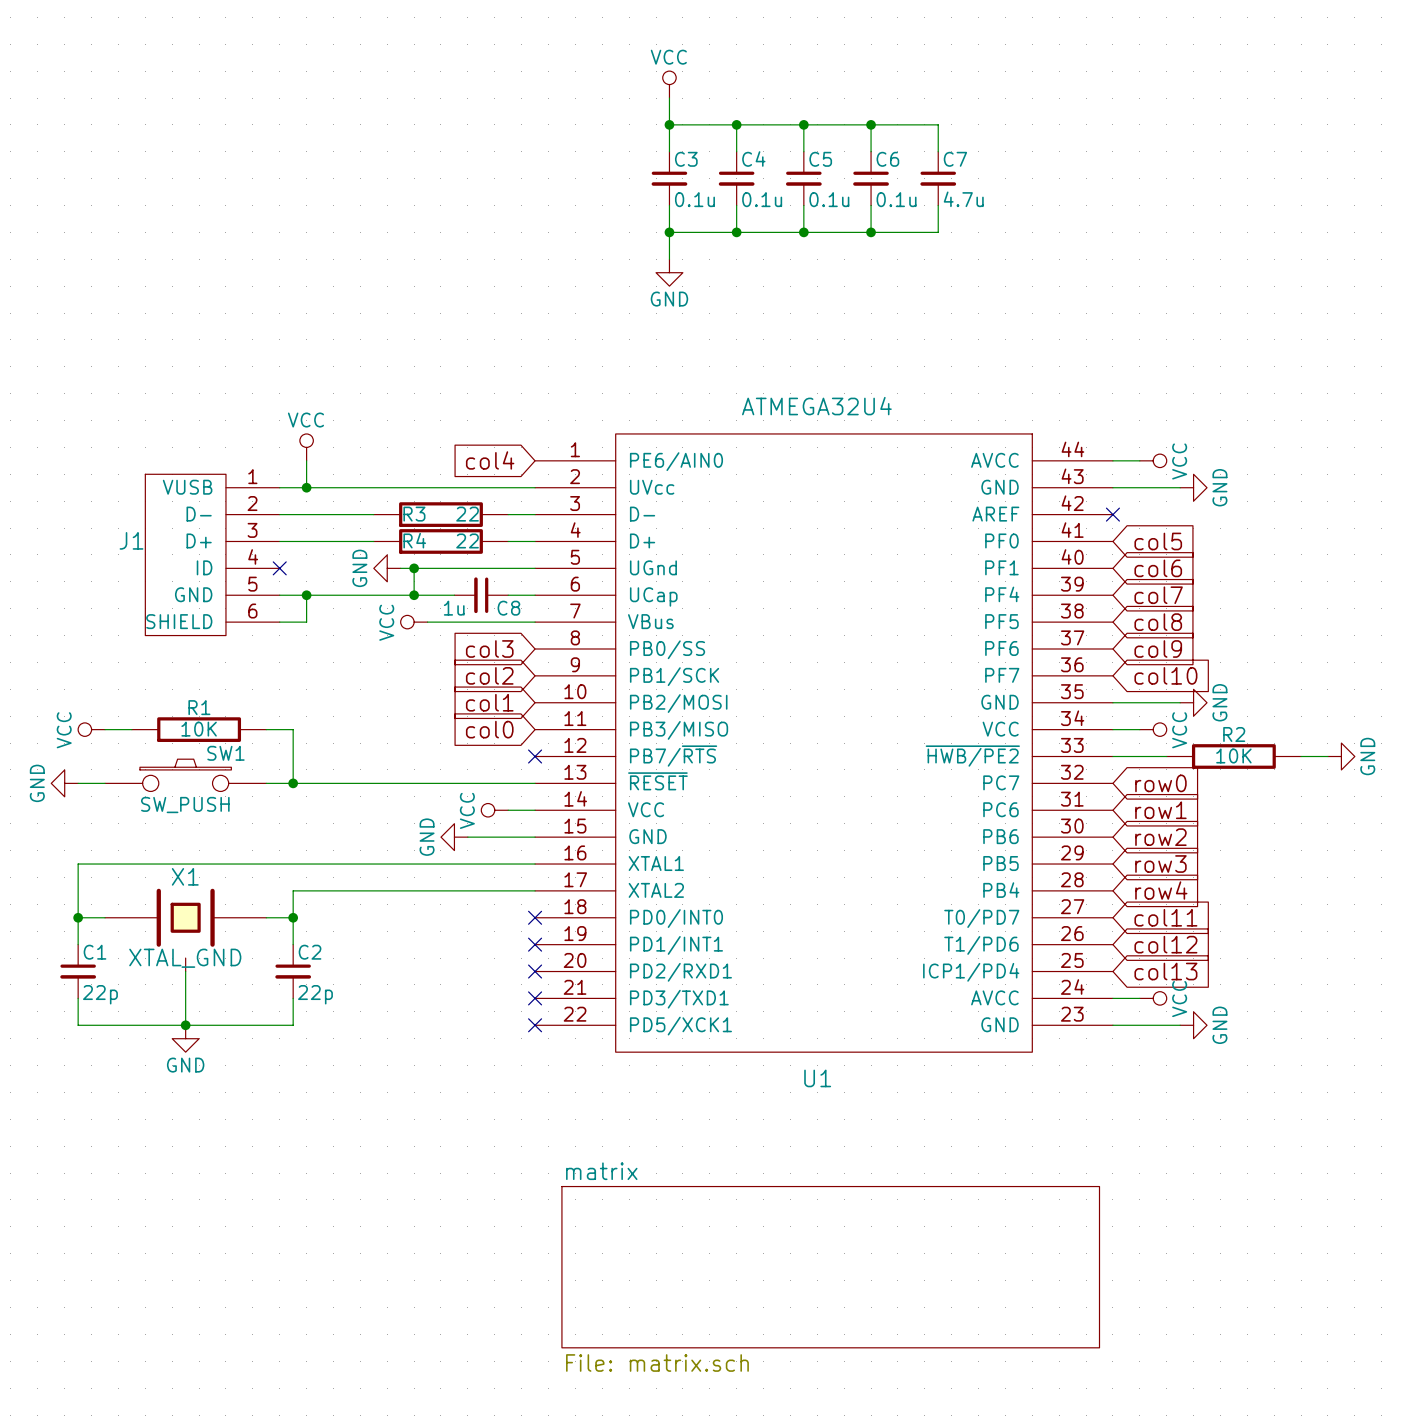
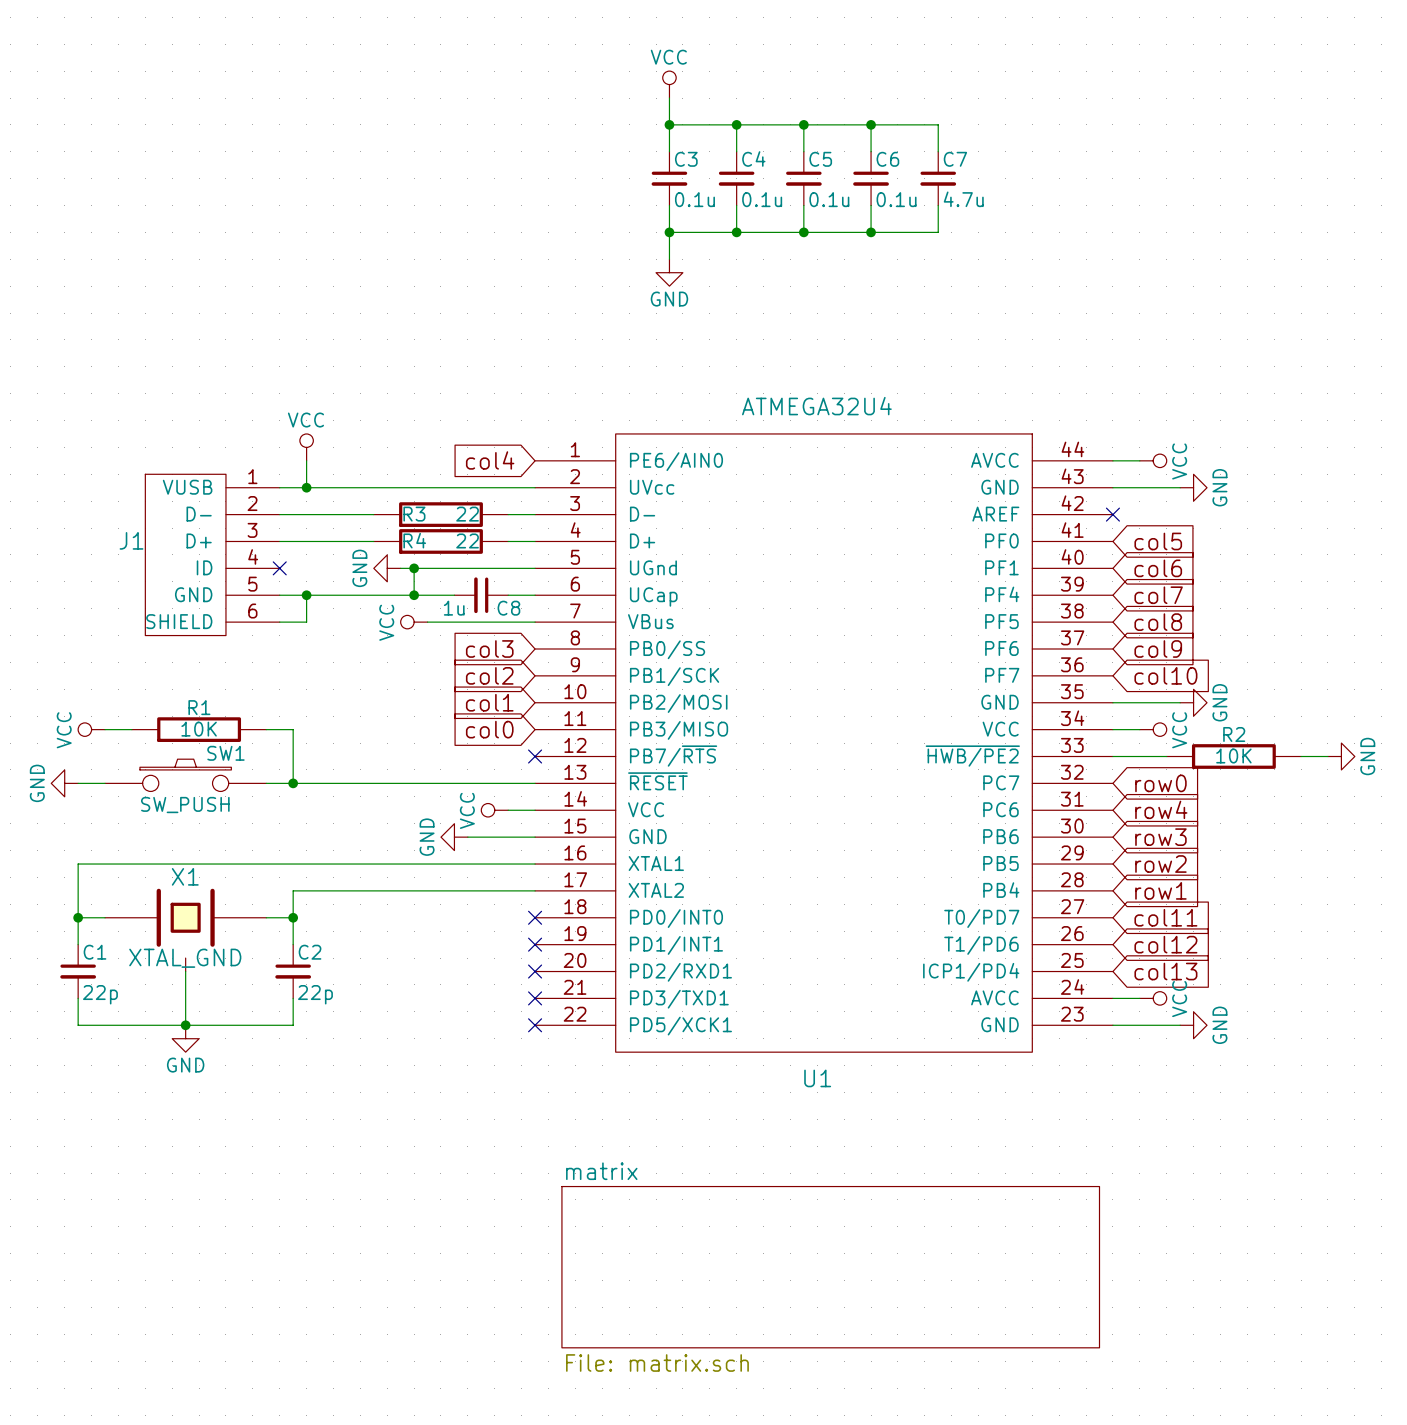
global label: row1 (1160, 810) -> row4 (1161, 809)
global label: row2 (1160, 837) -> row3 (1160, 837)
global label: row3 (1160, 864) -> row2 (1160, 864)
global label: row4 (1161, 890) -> row1 (1160, 890)

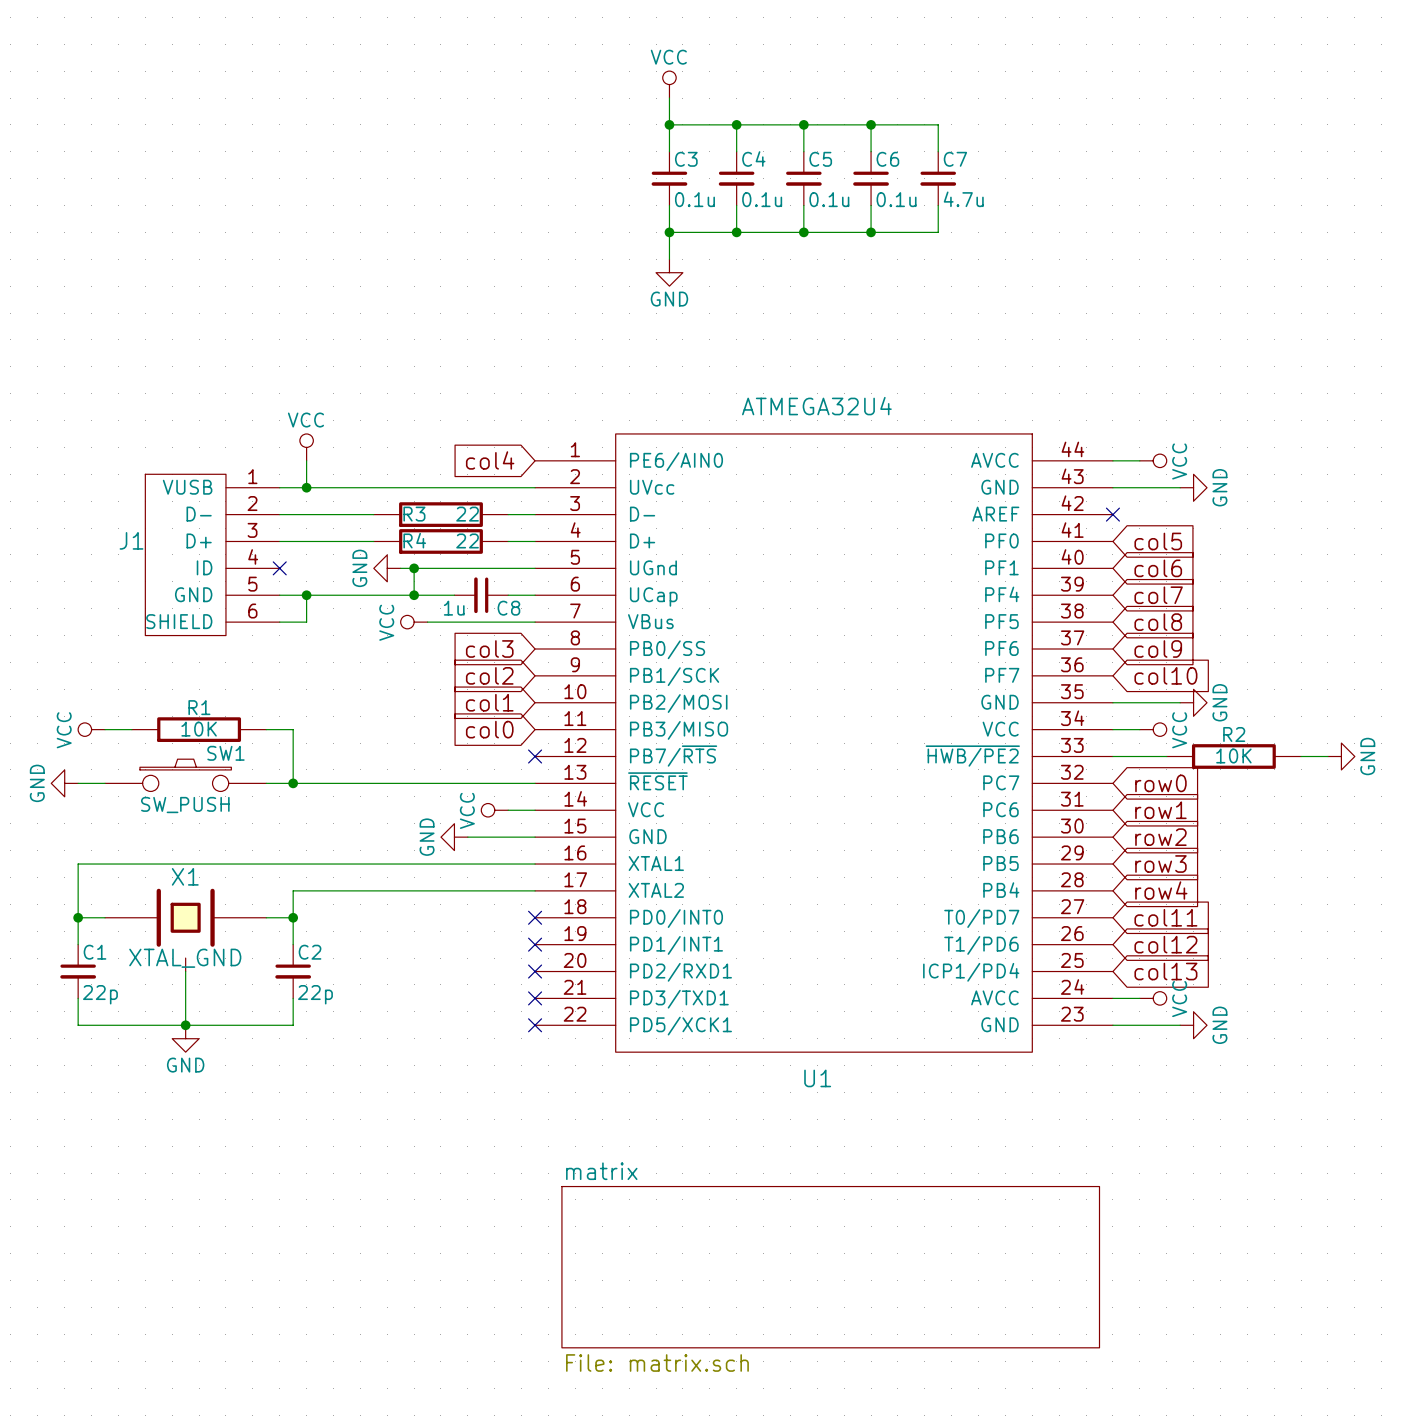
global label: row4 (1161, 809) -> row1 (1160, 810)
global label: row3 (1160, 837) -> row2 (1160, 837)
global label: row2 (1160, 864) -> row3 (1160, 864)
global label: row1 (1160, 890) -> row4 (1161, 890)

